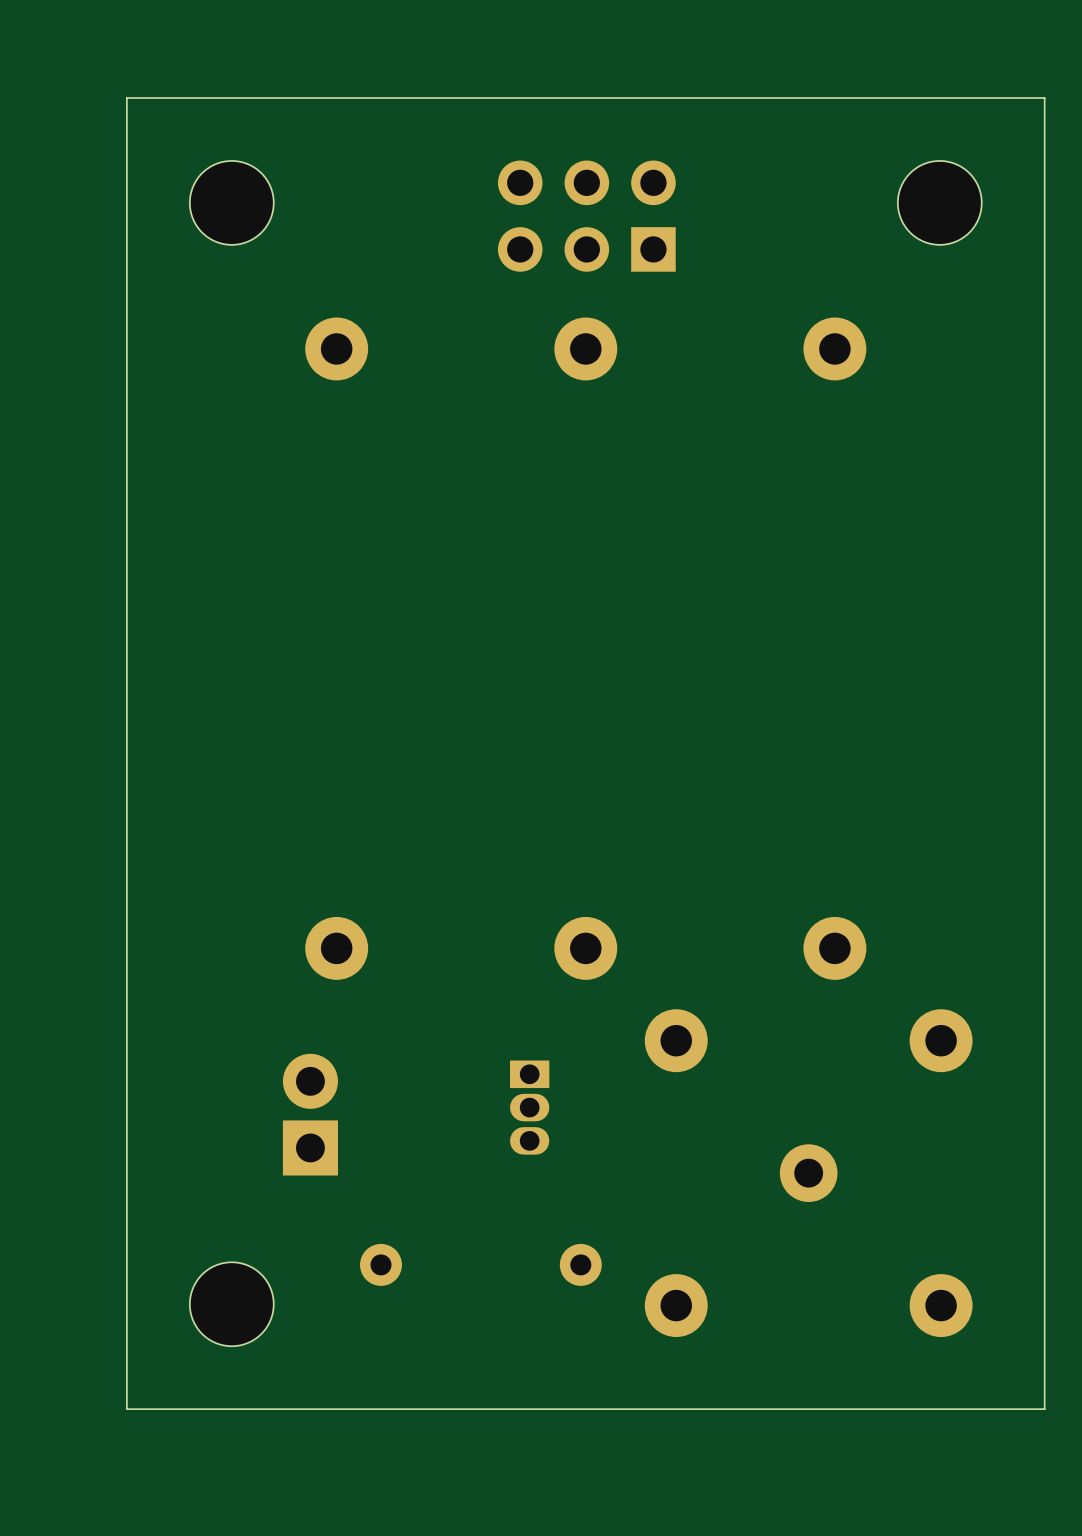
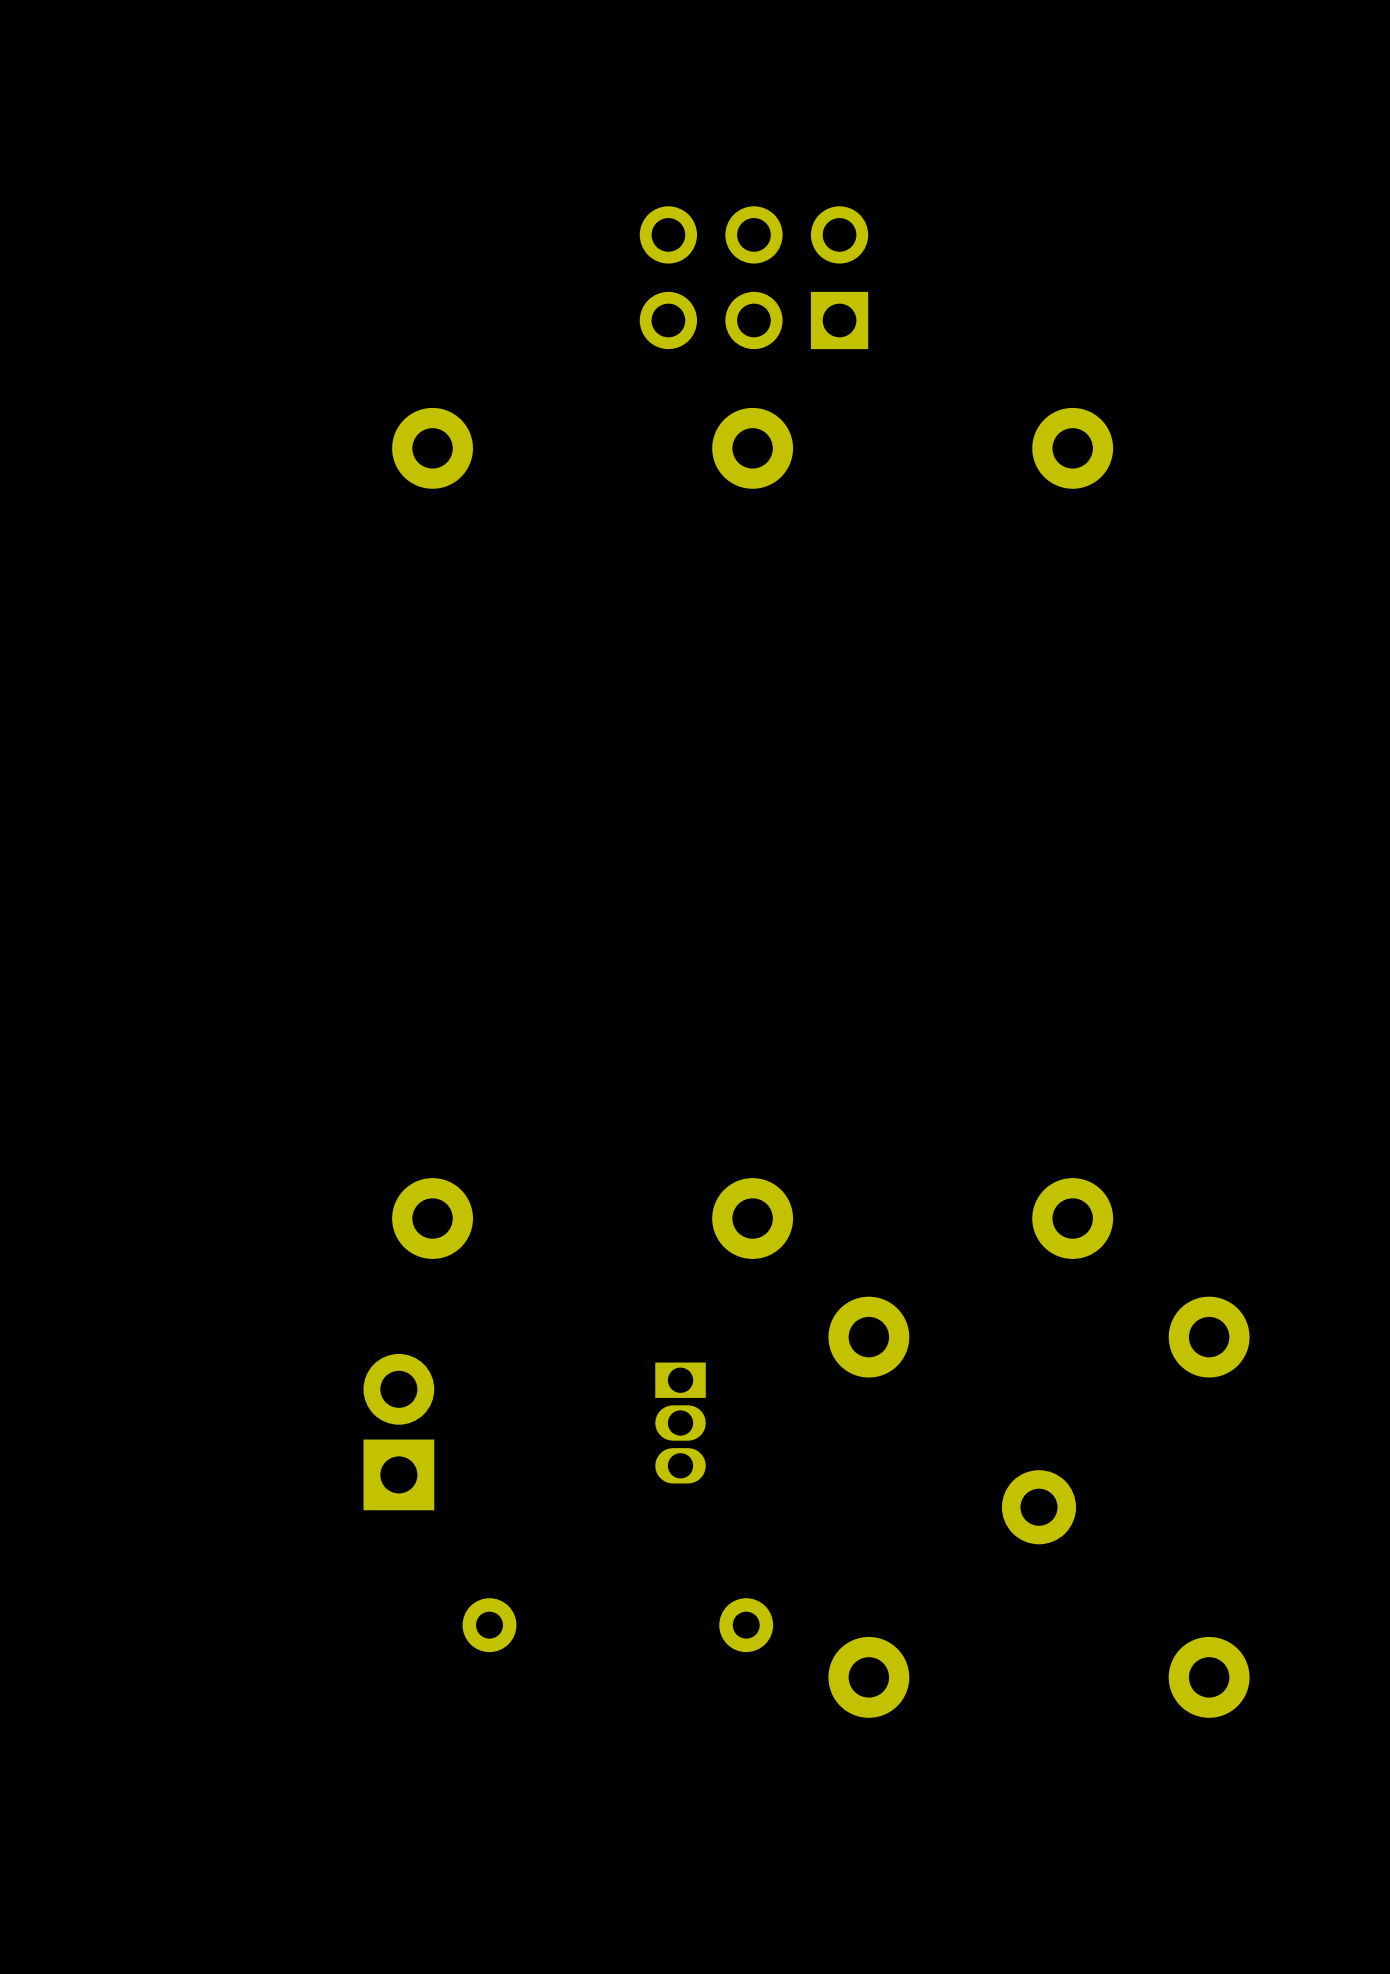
board edge: (1044, 98) (126, 98) (126, 1409) (1044, 1409) (1044, 98) -> none
part: (231, 202) -> none
part: (939, 202) -> none
part: (231, 1304) -> none

